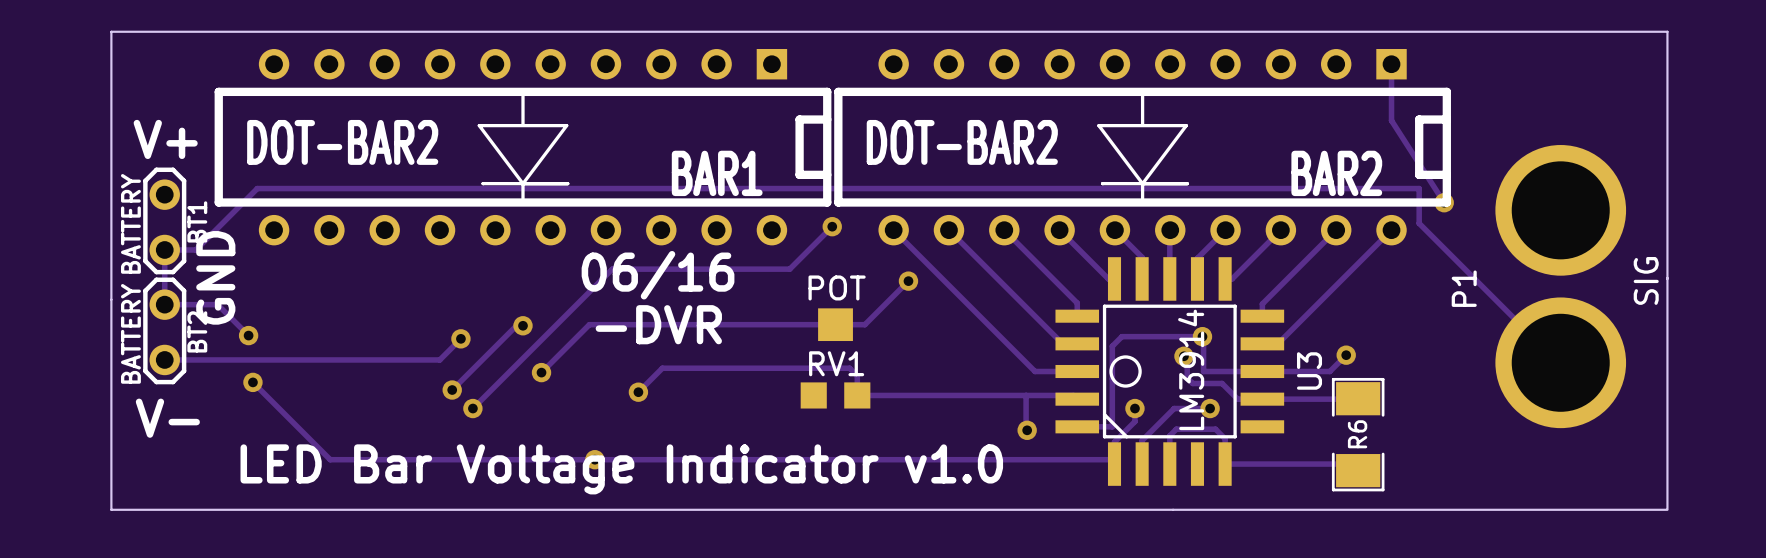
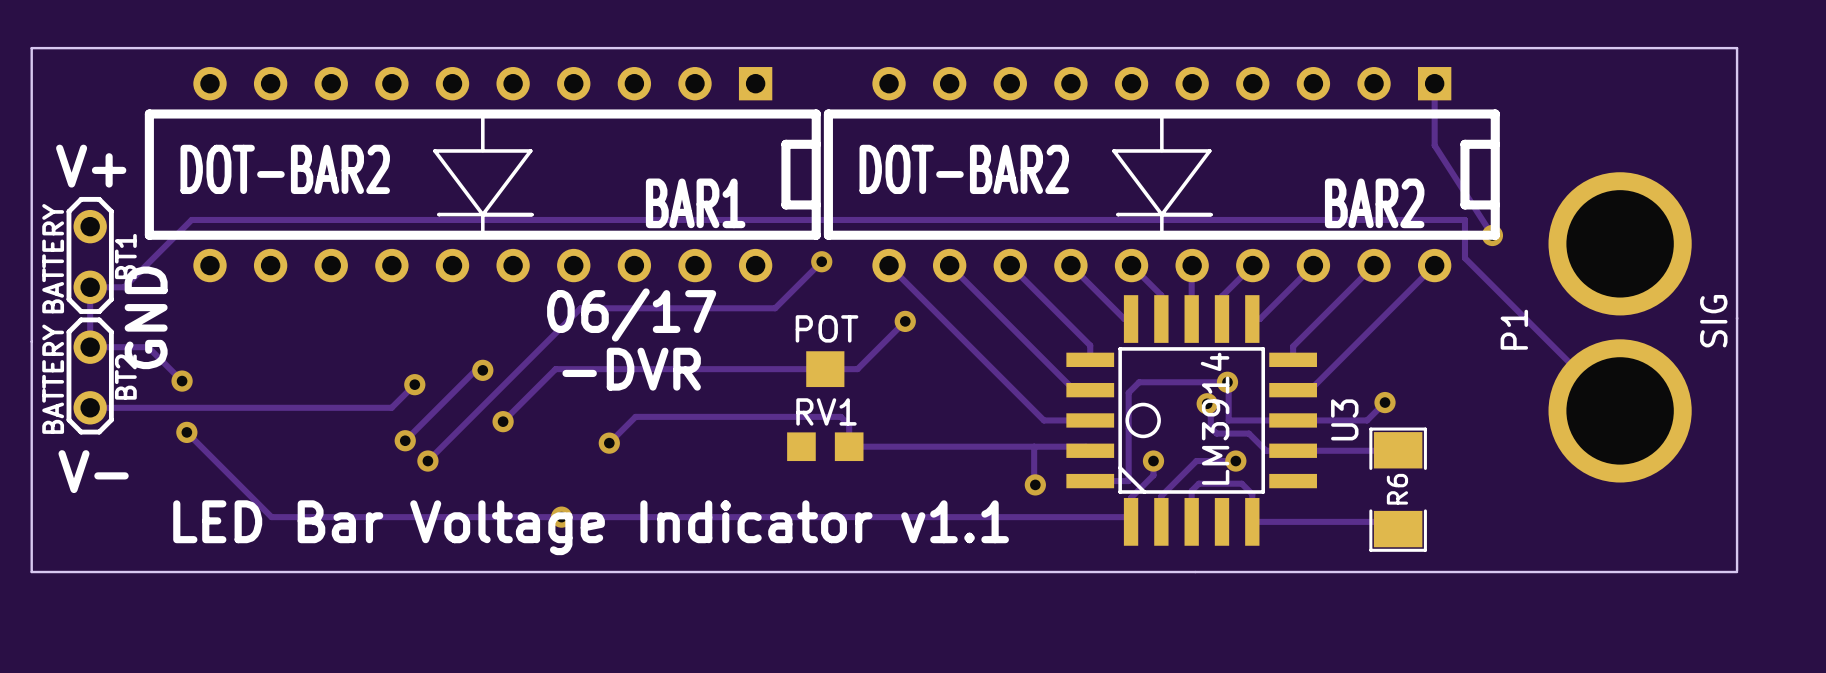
text: 06/16 (658, 275) -> 06/17 (631, 314)
text: LED Bar Voltage Indicator v1.0 (621, 469) -> LED Bar Voltage Indicator v1.1 (591, 527)

